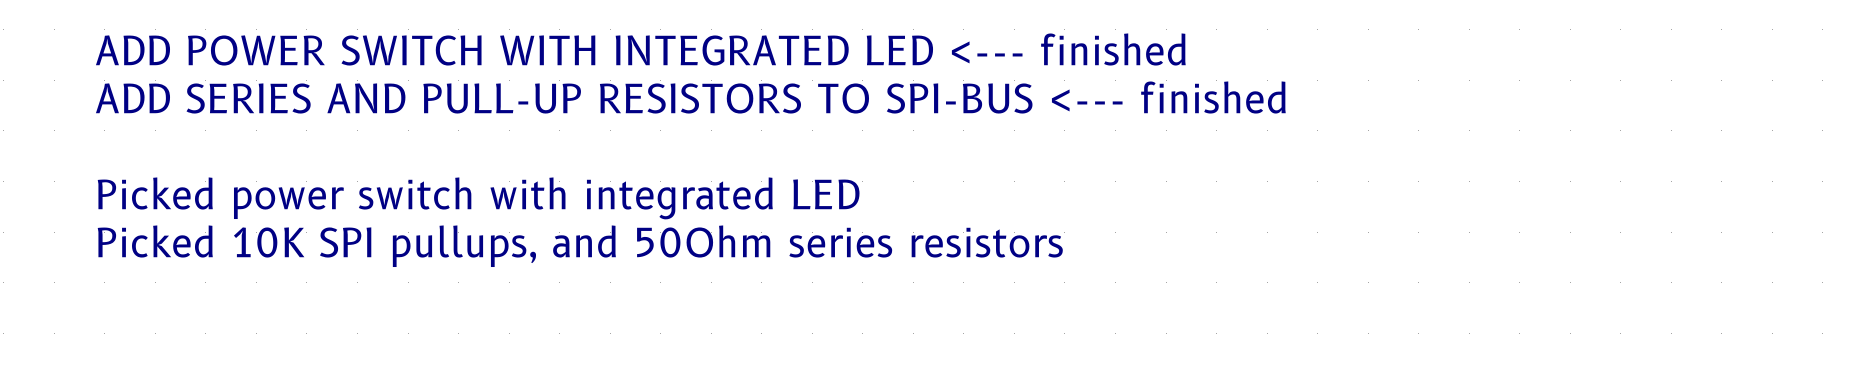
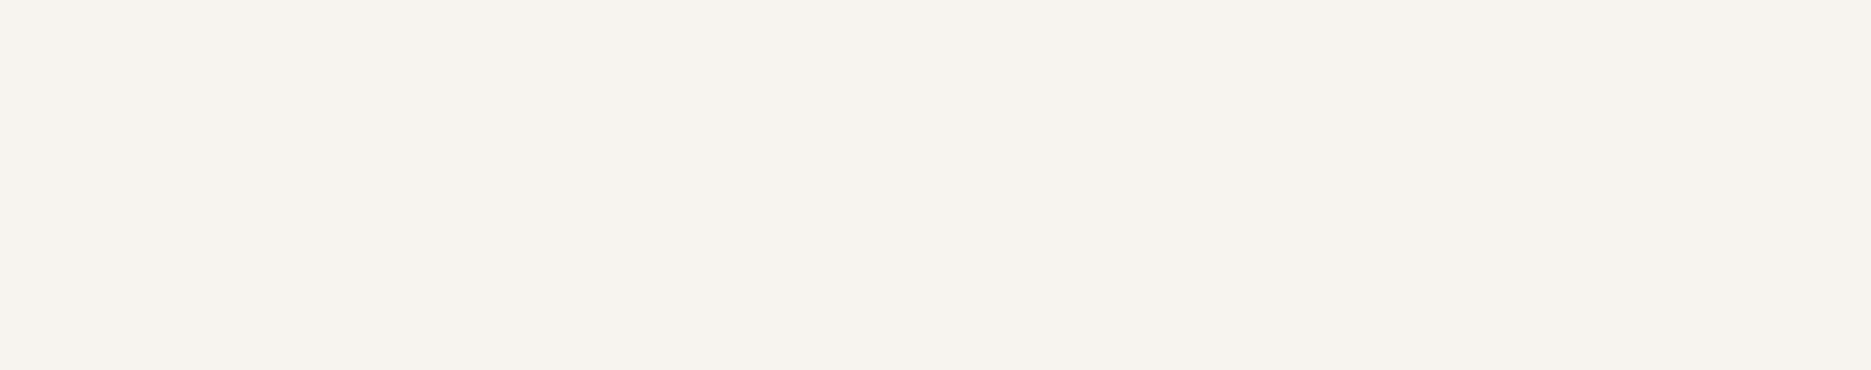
text: ADD POWER SWITCH WITH INTEGRATED LED <--- finished (640, 49) -> none
text: ADD SERIES AND PULL-UP RESISTORS TO SPI-BUS <--- finished (690, 97) -> none
text: Picked power switch with integrated LED (478, 198) -> none
text: Picked 10K SPI pullups, and 50Ohm series resistors (580, 246) -> none

